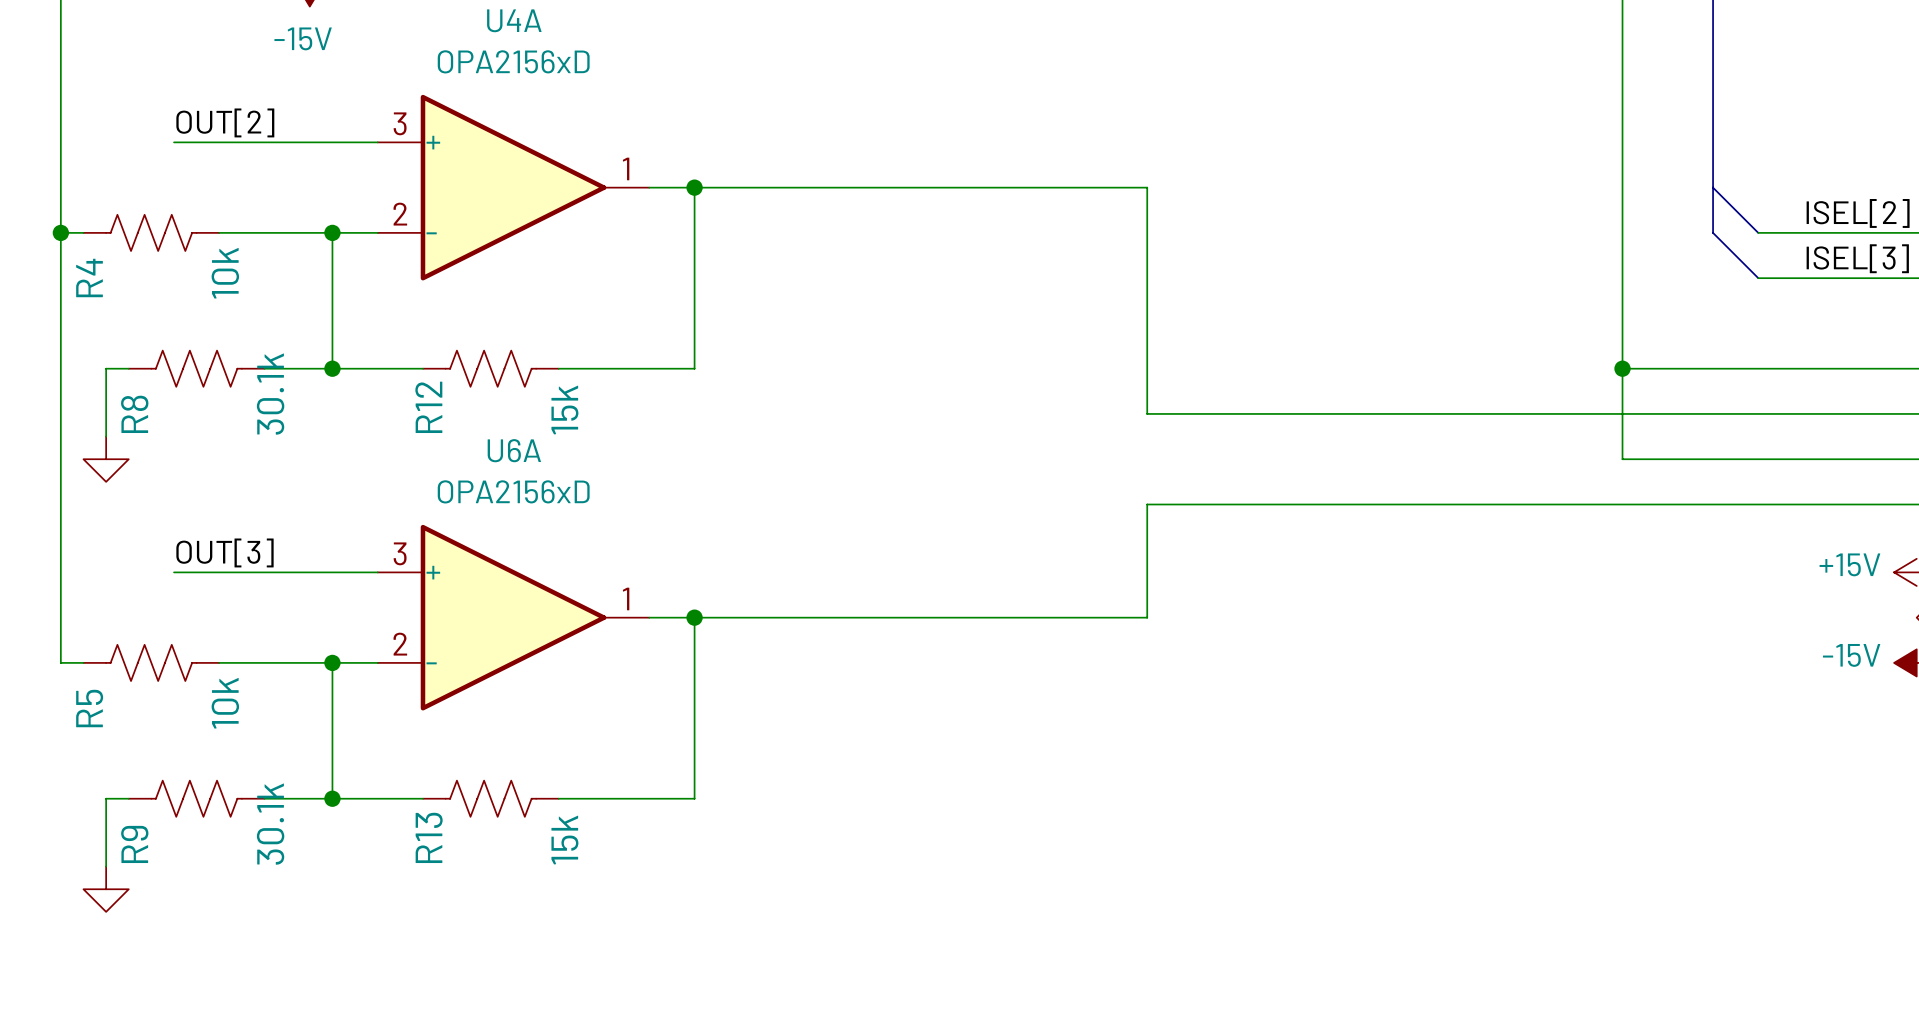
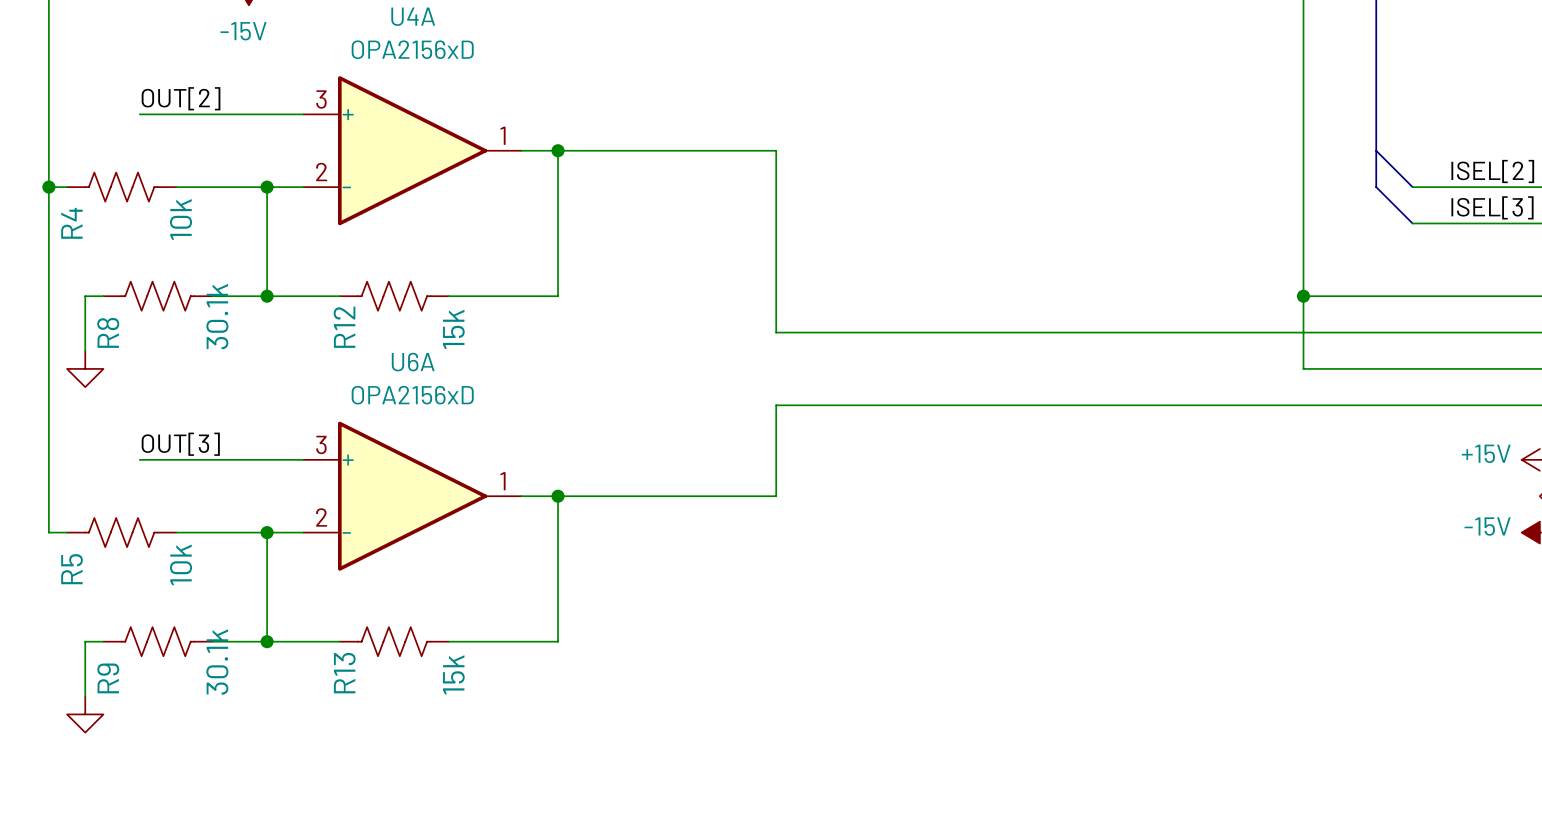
wire: (966, 187) (1147, 187) (1147, 413) -> (776, 150) (776, 332) (921, 332)
wire: (1147, 504) (1147, 617) (966, 617) -> (921, 405) (776, 405) (776, 496)

